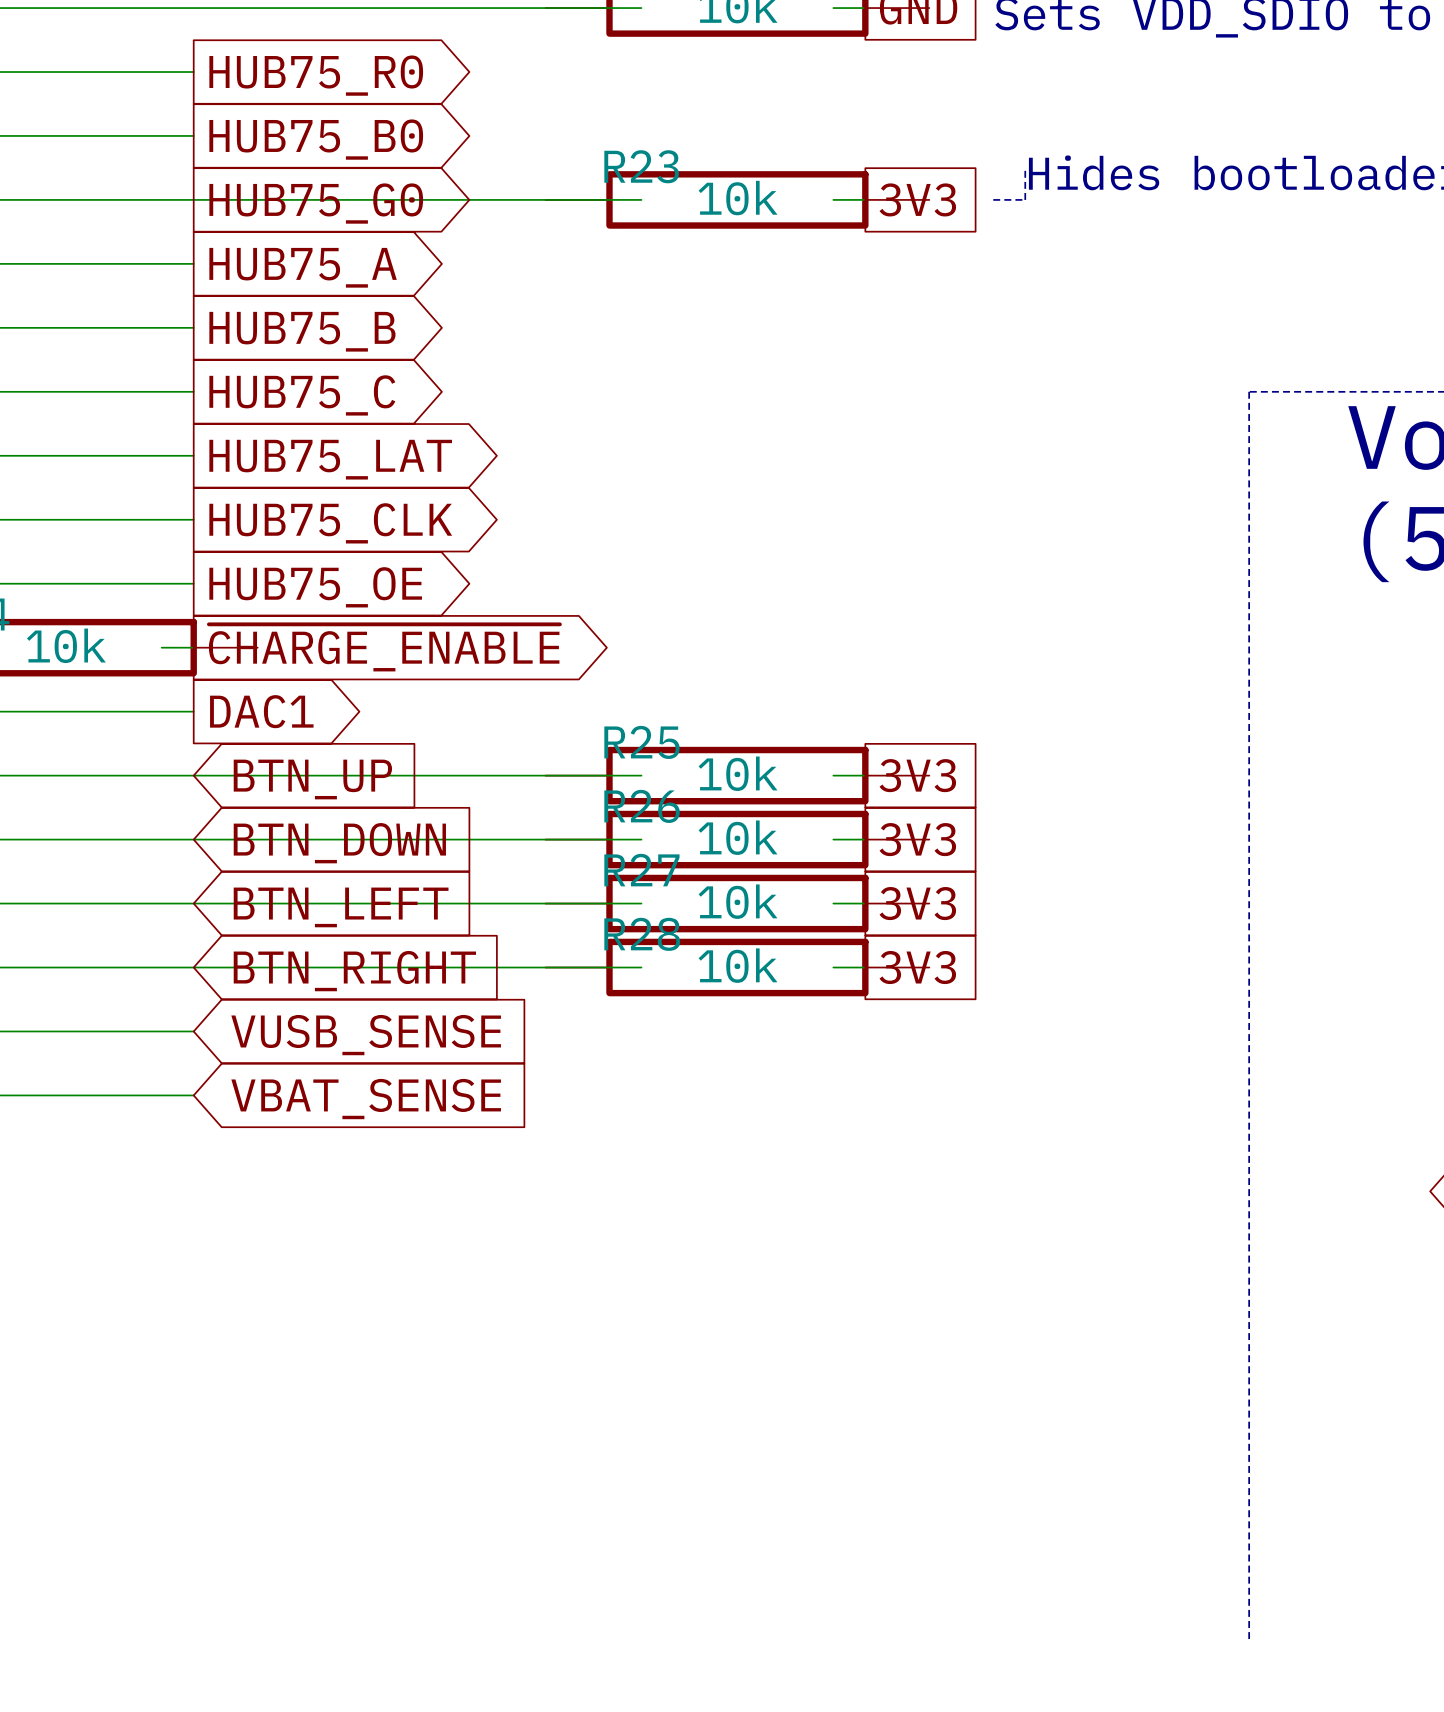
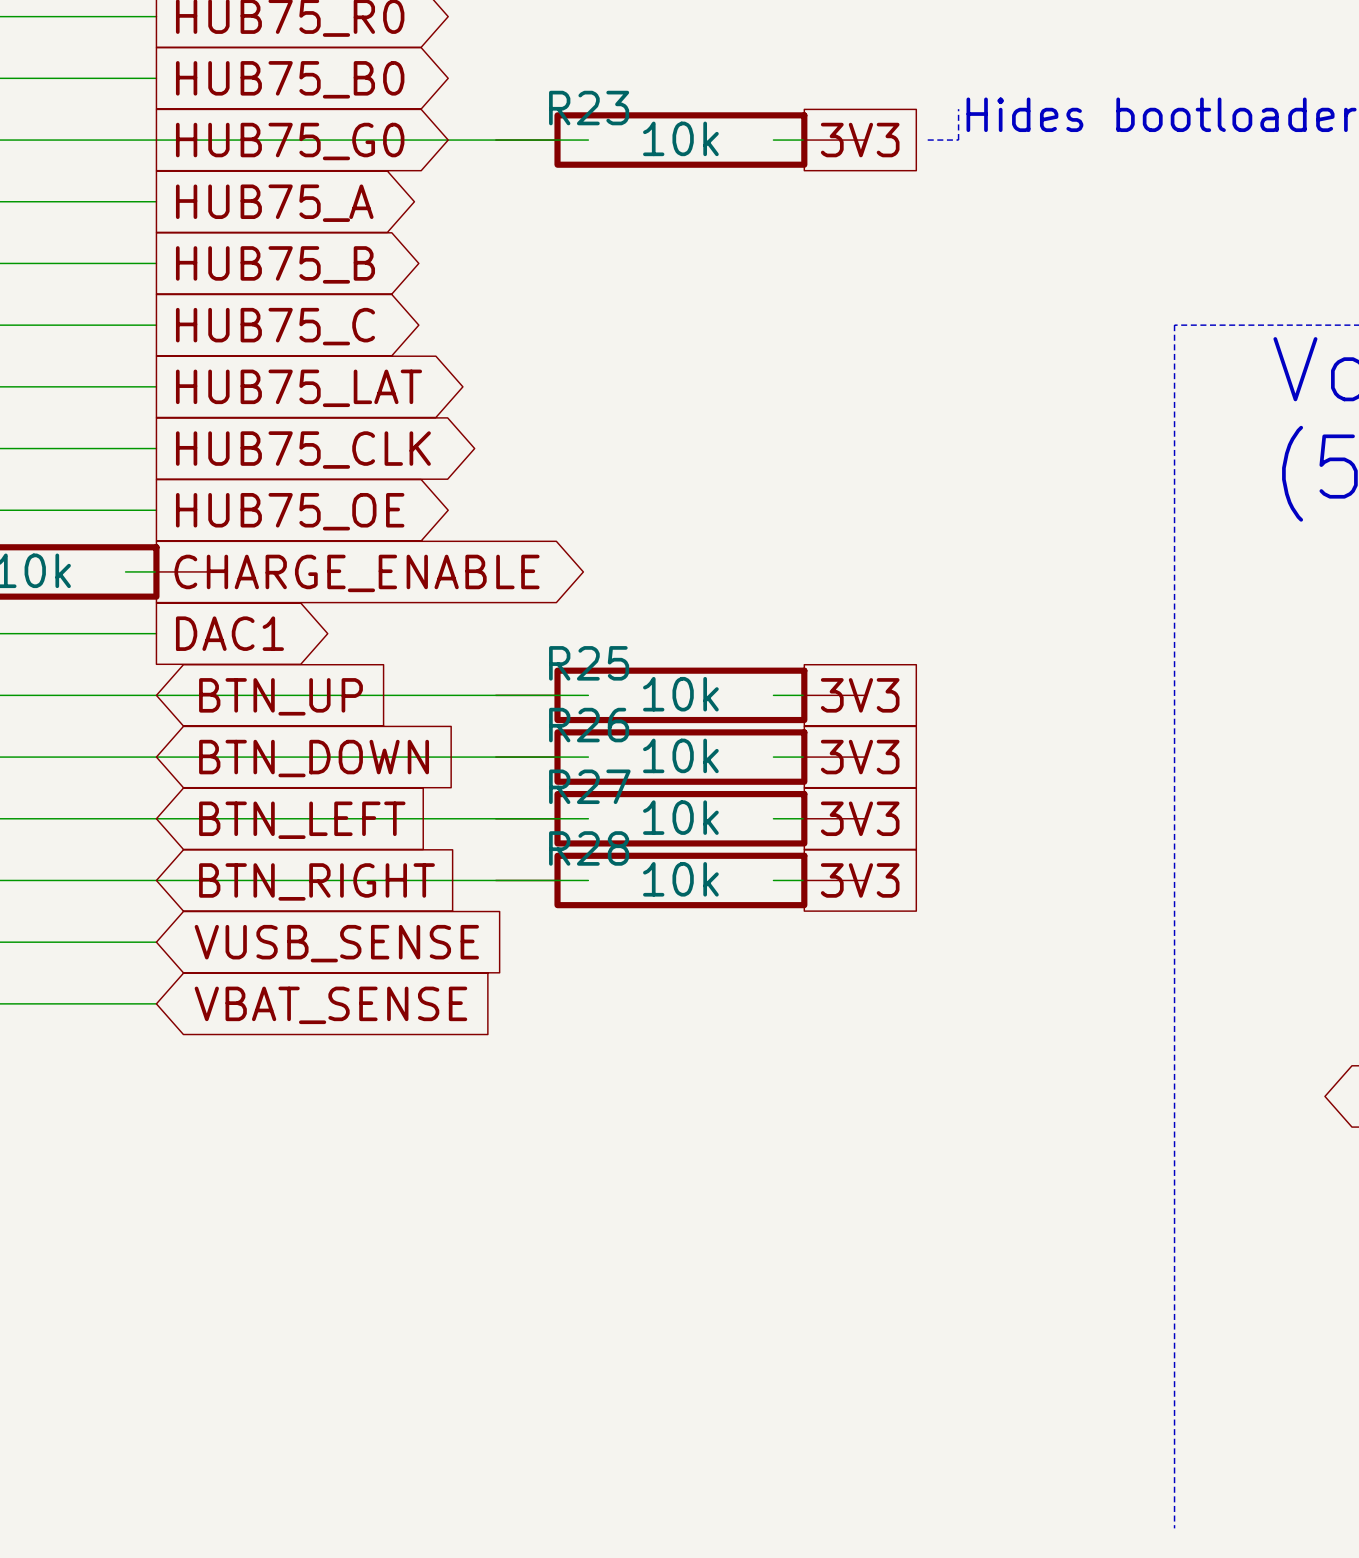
global label: ~{CHARGE_ENABLE} (384, 647) -> CHARGE_ENABLE (357, 573)

